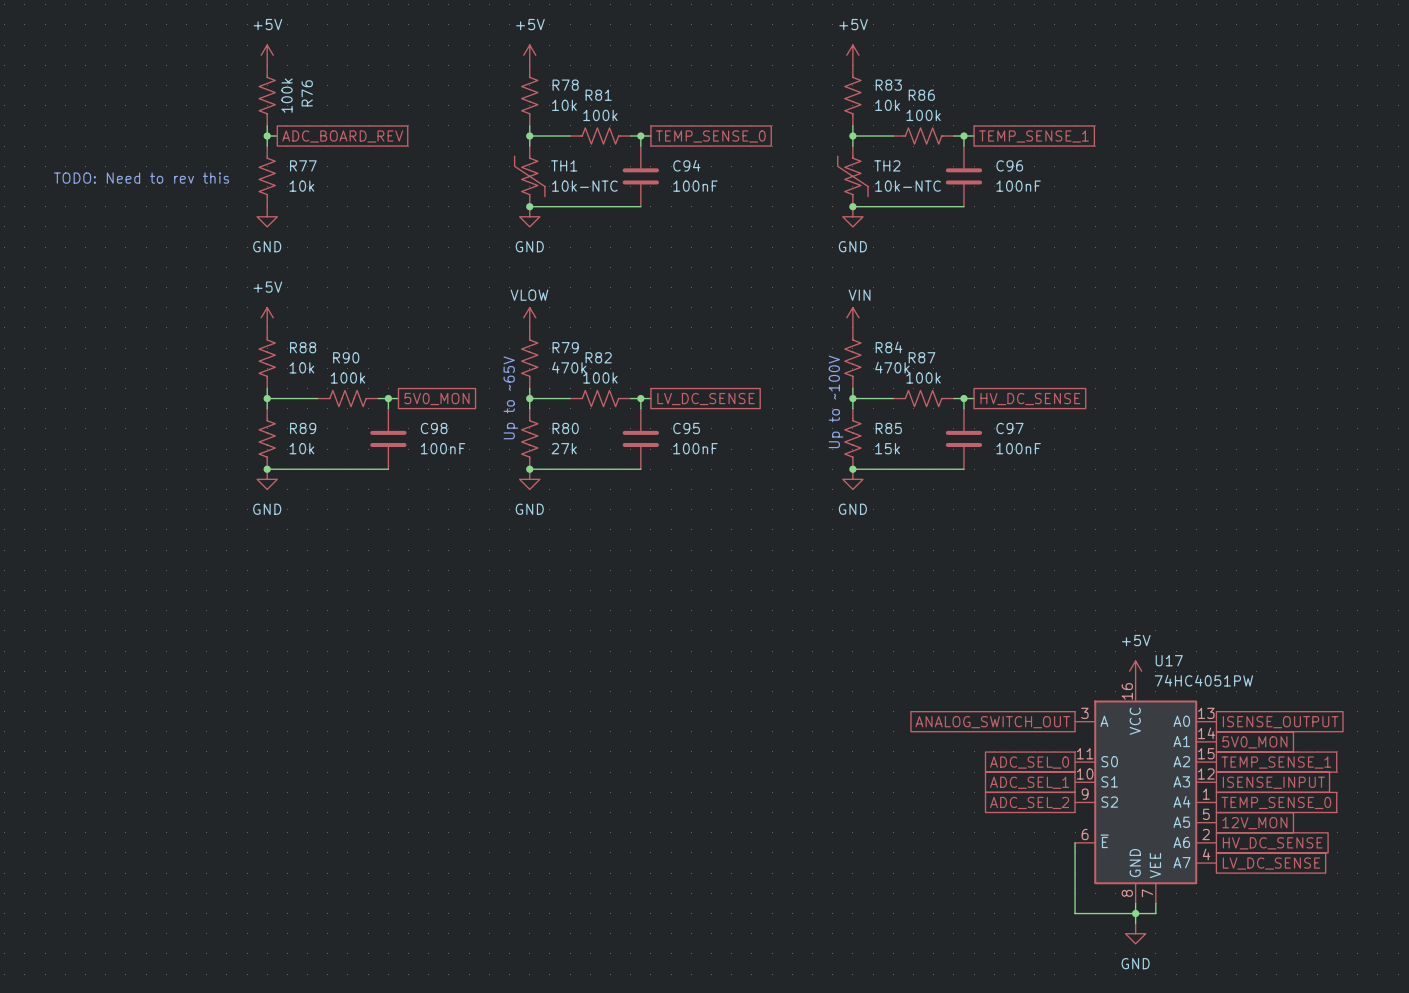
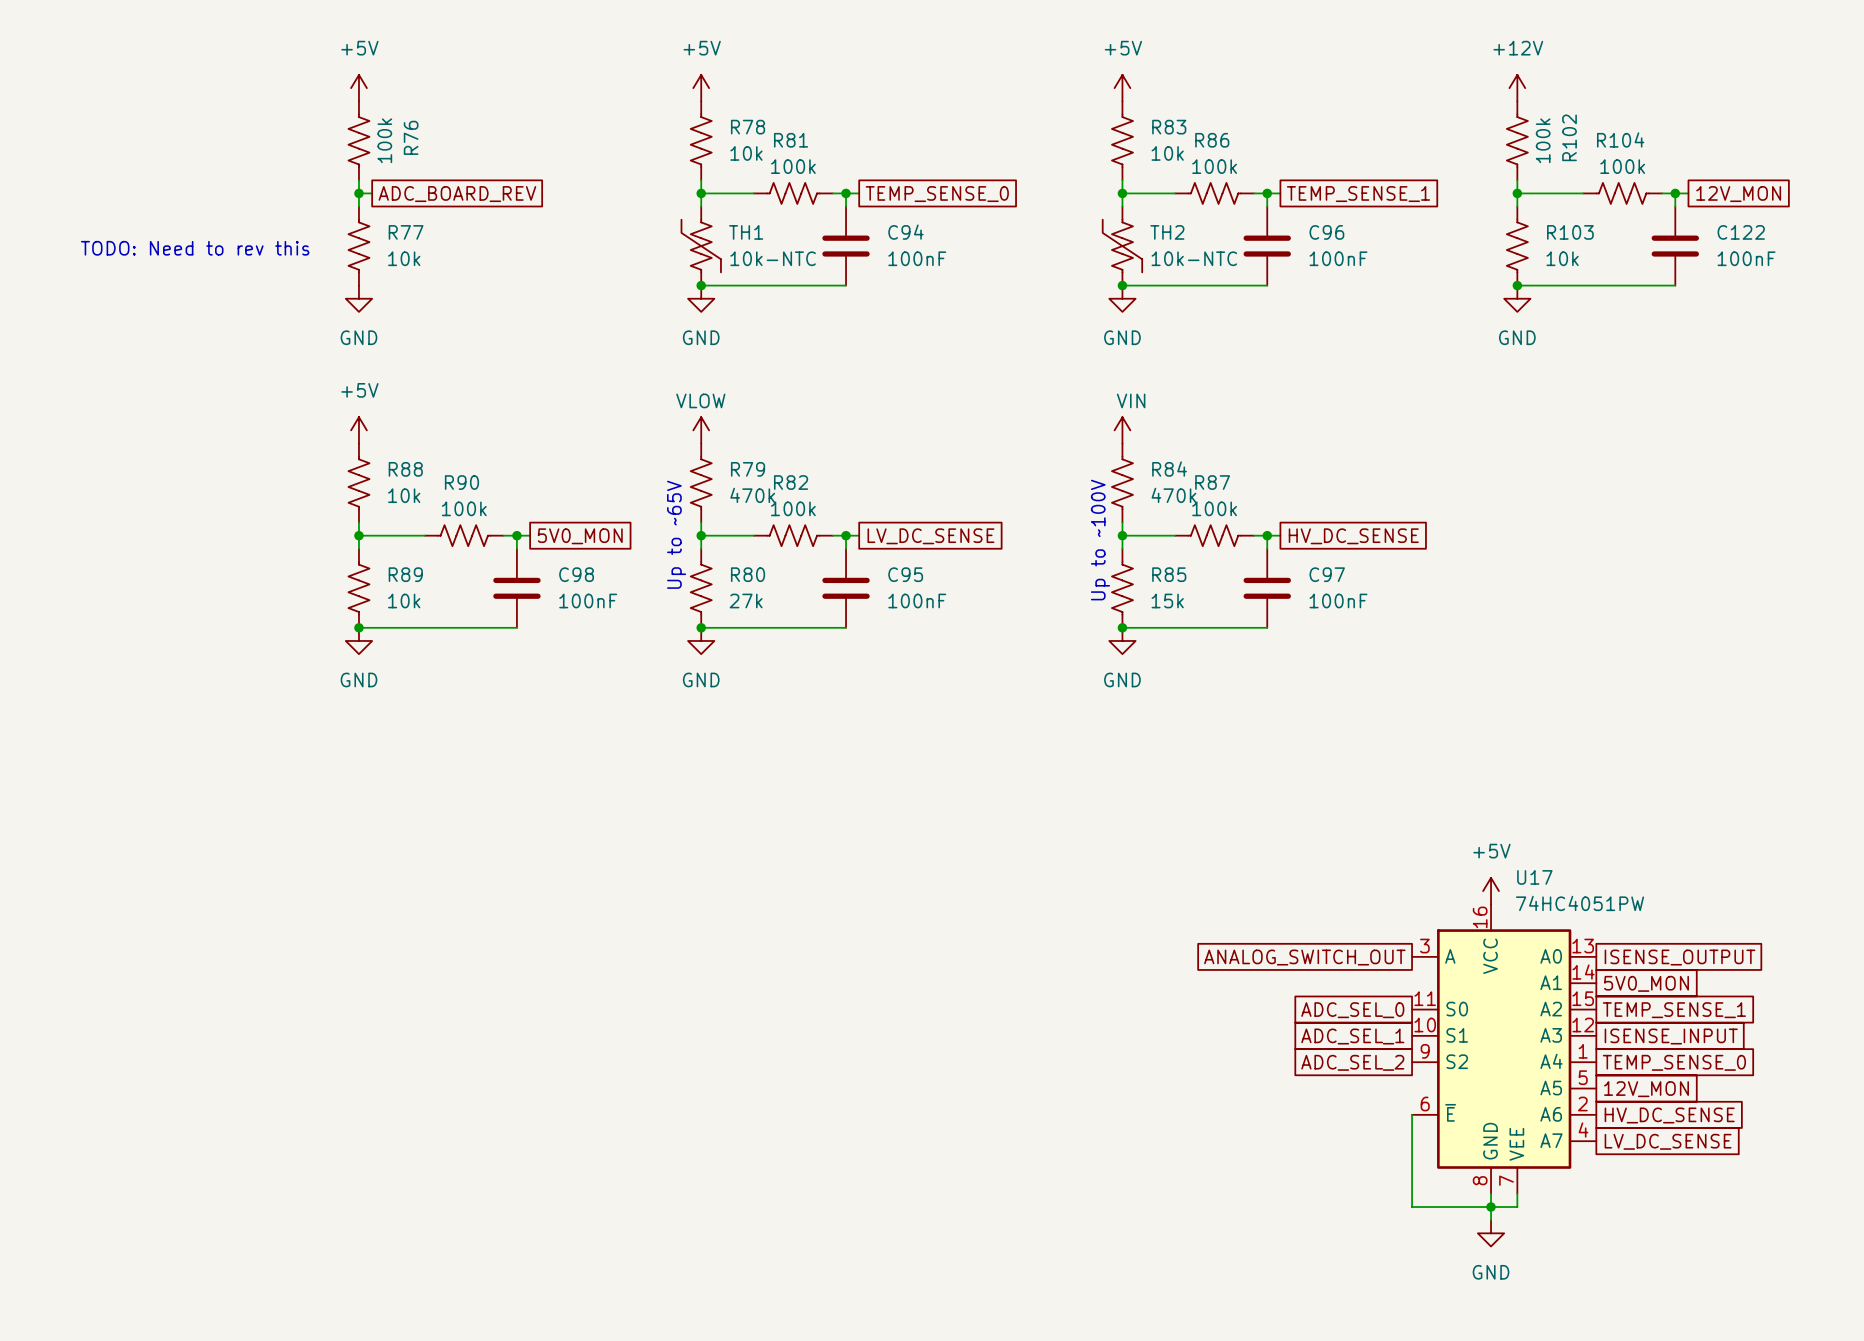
power symbol: none -> +12V (1517, 88)
R102: none -> 100k (1517, 140)
wire: none -> (1517, 180) (1517, 206)
wire: none -> (1517, 193) (1583, 193)
junction: none -> (1517, 193)
R104: none -> 100k (1622, 193)
wire: none -> (1662, 193) (1688, 193)
wire: none -> (1675, 193) (1675, 206)
junction: none -> (1675, 193)
global label: none -> 12V_MON (1738, 194)
R103: none -> 10k (1517, 246)
C122: none -> 100nF (1675, 246)
wire: none -> (1517, 285) (1675, 285)
junction: none -> (1517, 285)
power symbol: none -> GND (1517, 298)

